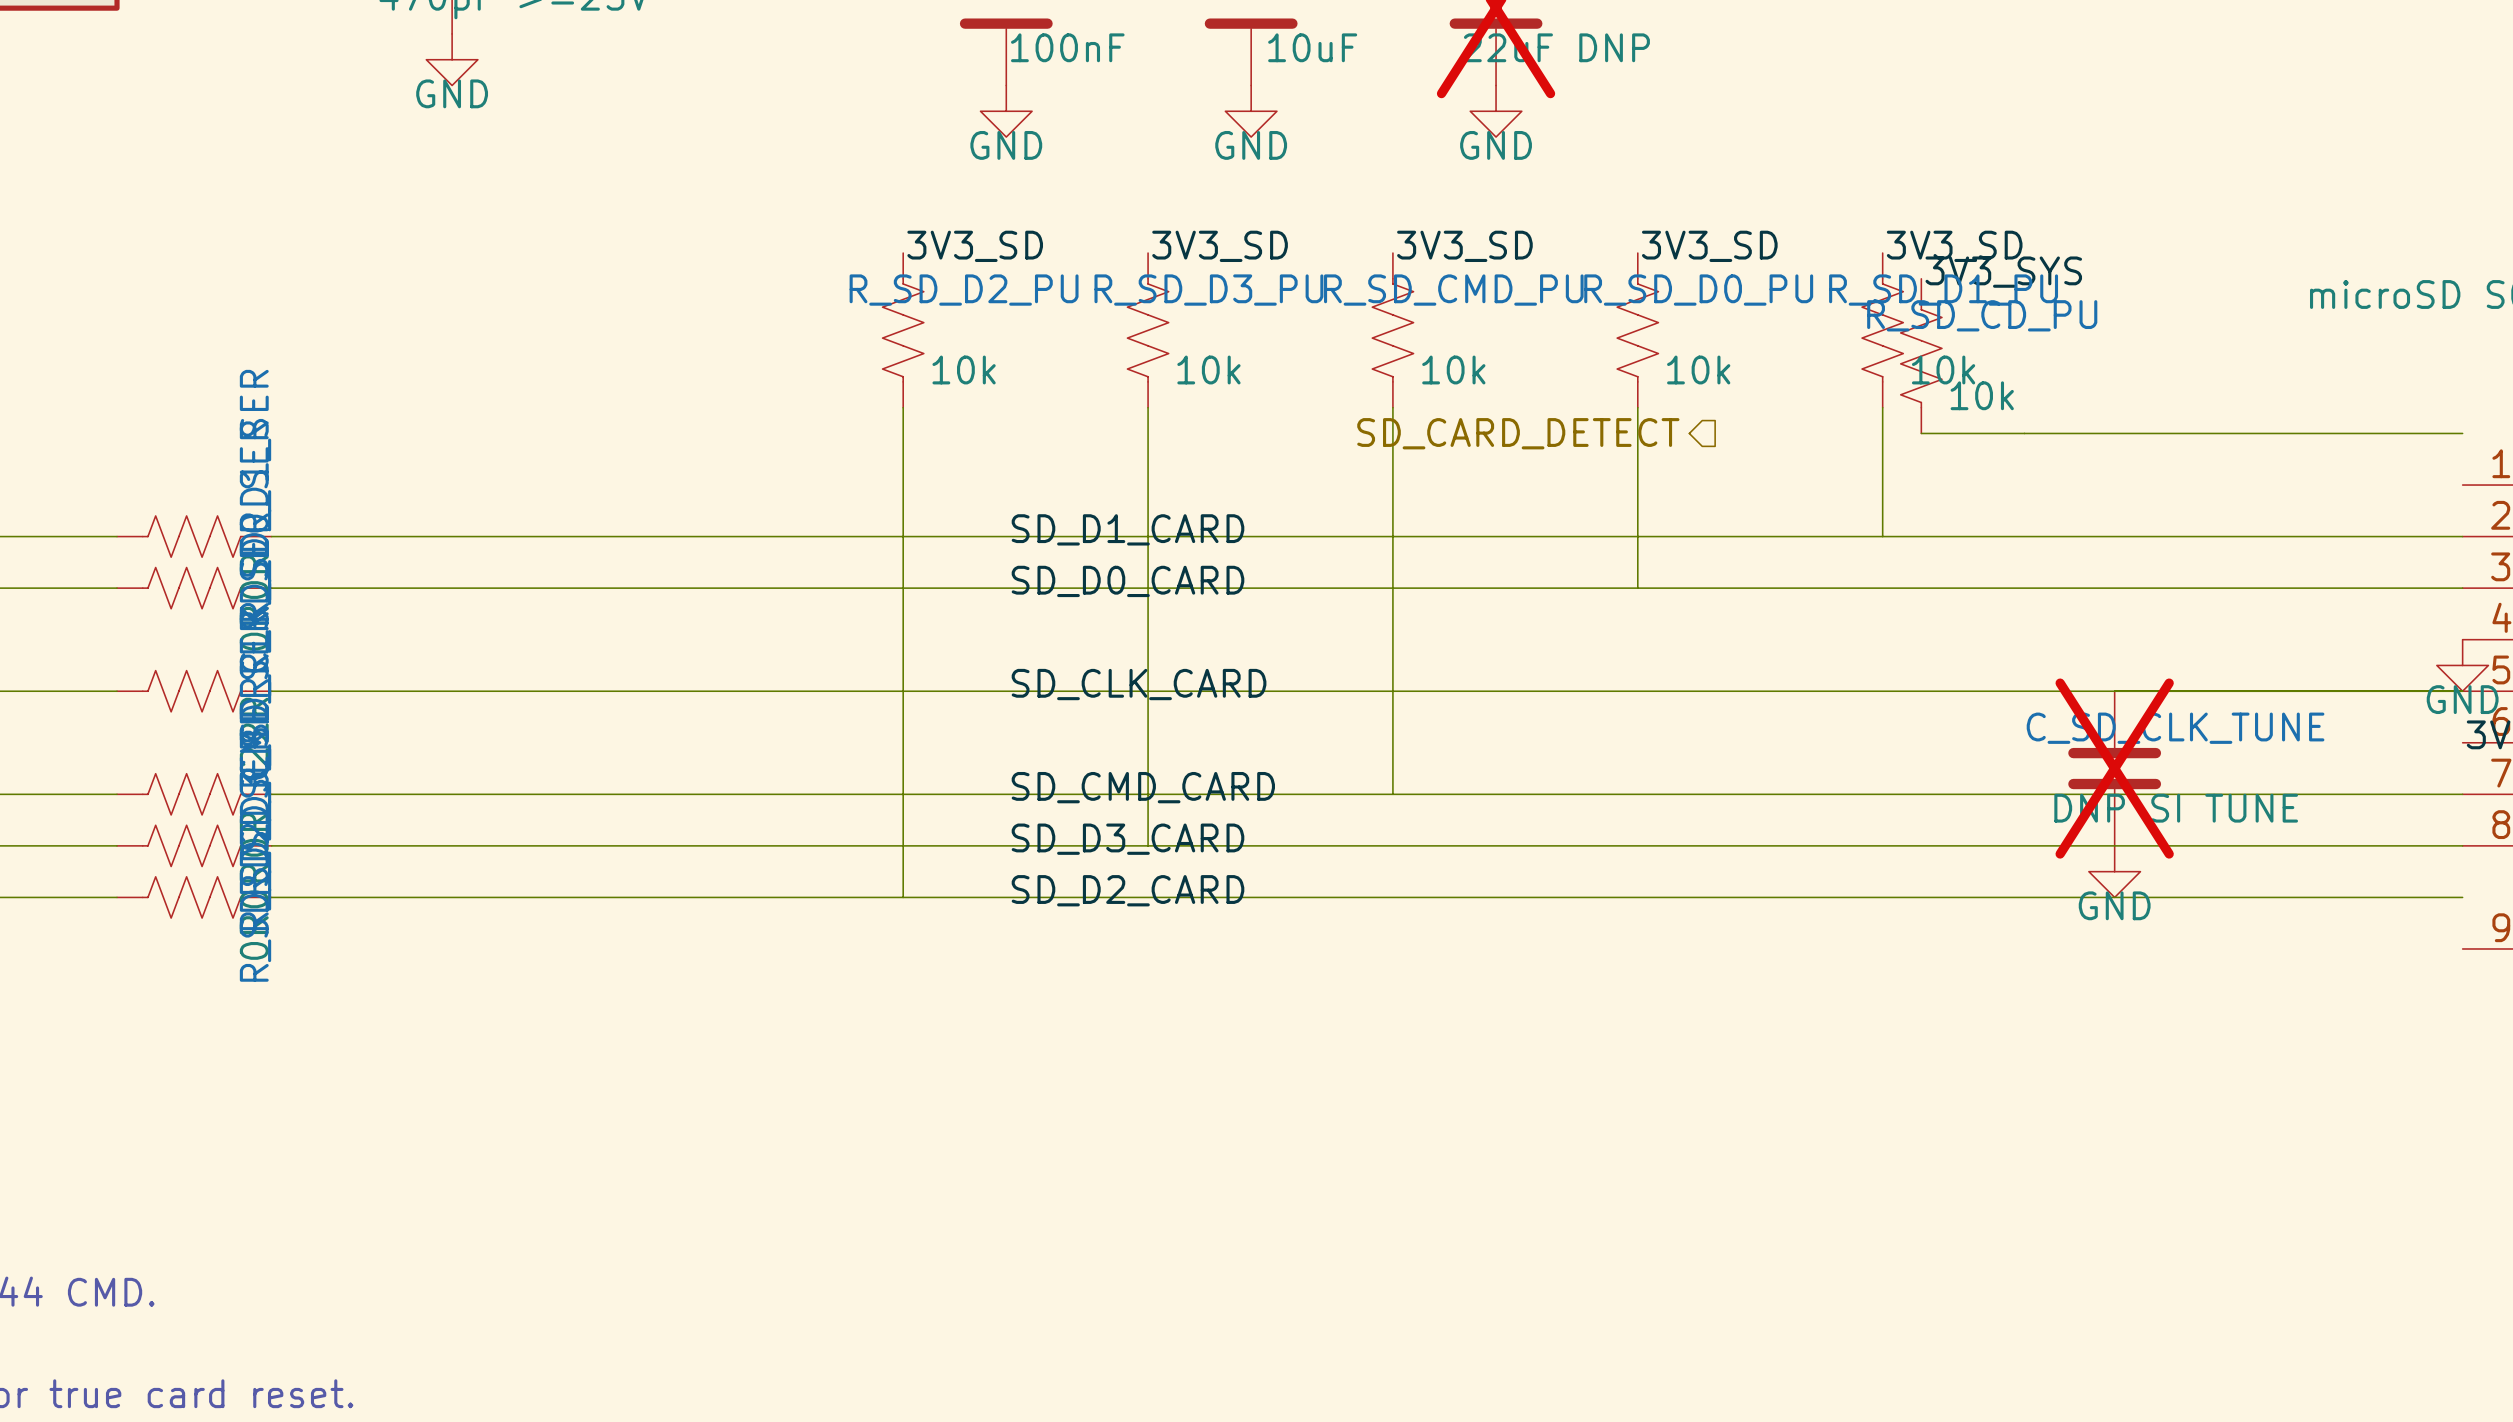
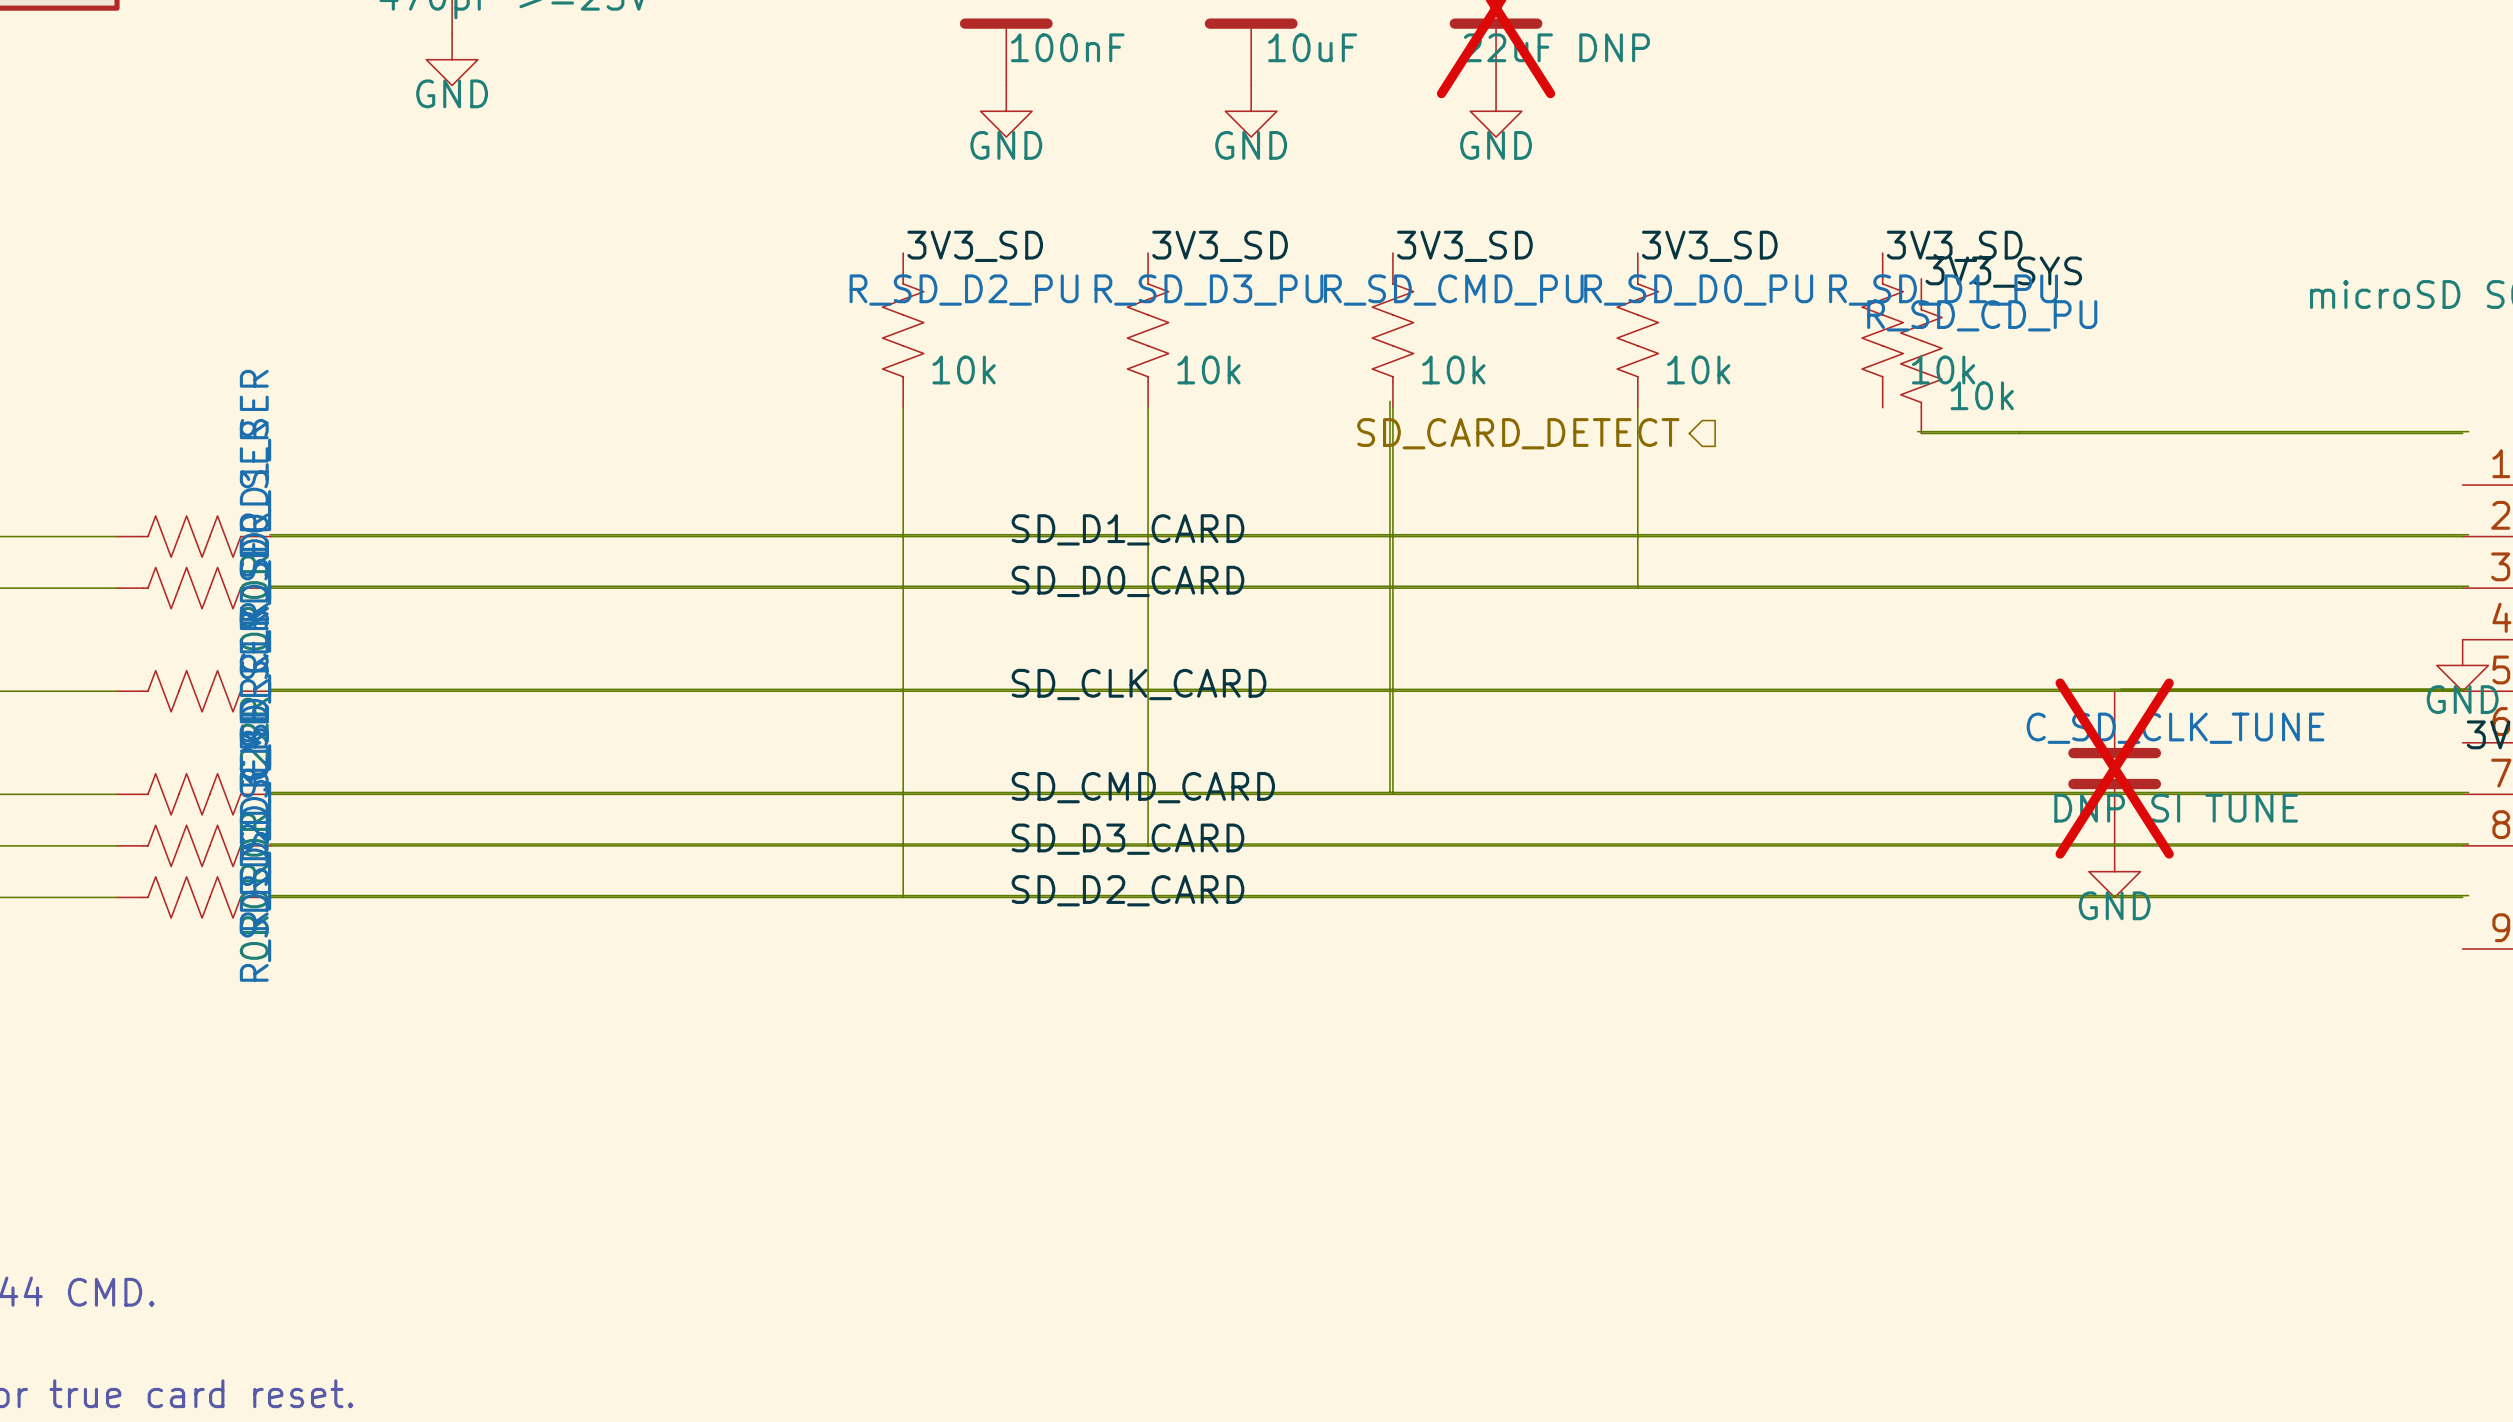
wire: none -> (1389, 401) (1389, 792)
wire: (1882, 407) (1882, 536) -> none
wire: none -> (1917, 431) (2468, 431)
wire: none -> (269, 534) (2468, 534)
wire: none -> (269, 586) (2468, 586)
wire: none -> (269, 689) (2468, 689)
wire: none -> (269, 792) (2468, 792)
wire: none -> (269, 844) (2468, 844)
wire: none -> (269, 895) (2468, 895)

